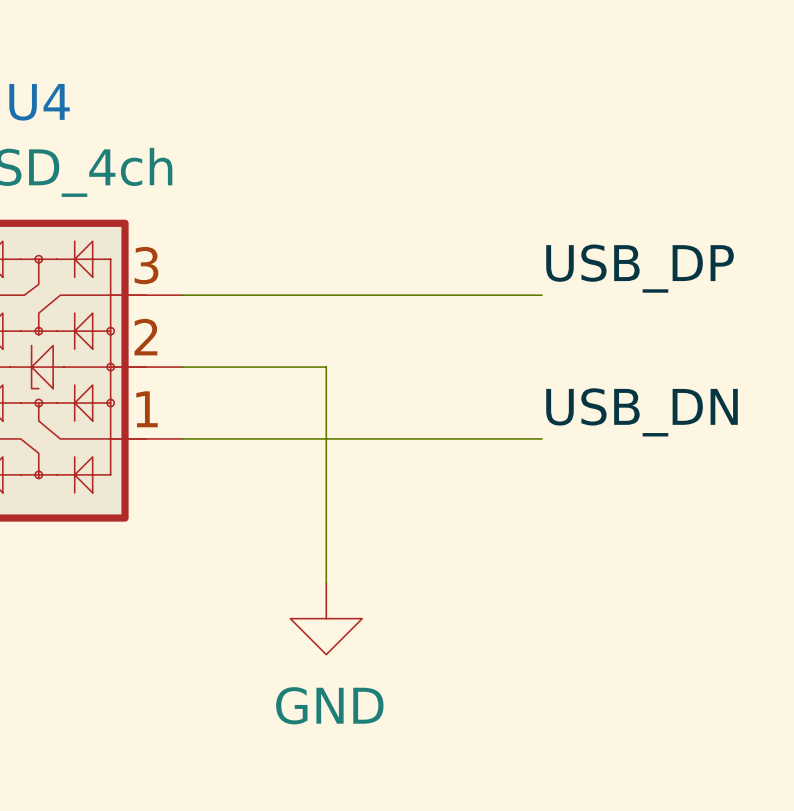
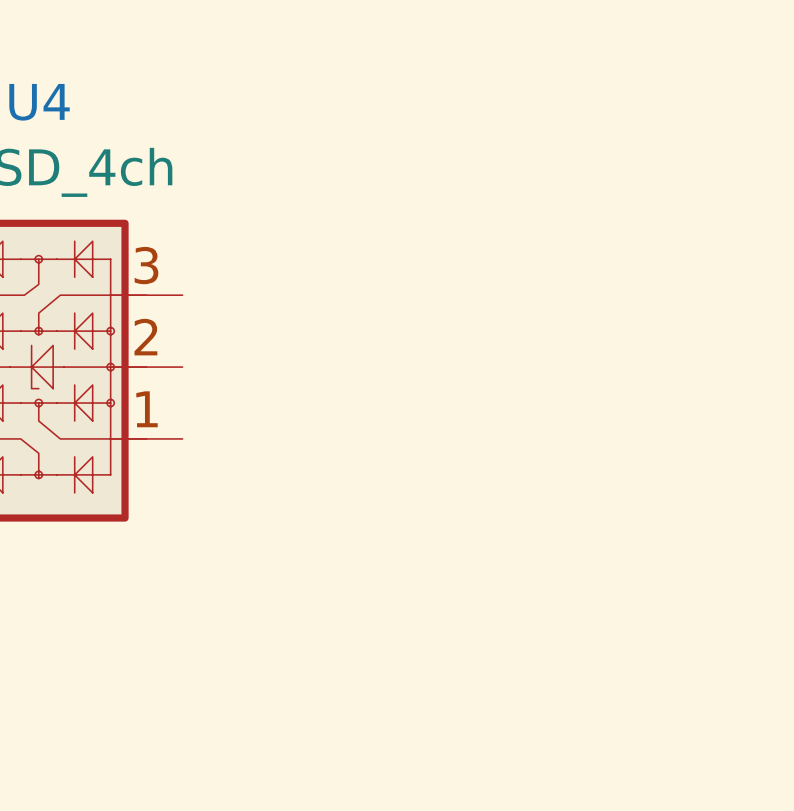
label: USB_DP (640, 268) -> none
wire: (182, 295) (541, 295) -> none
wire: (182, 367) (326, 367) (326, 582) -> none
label: USB_DN (642, 412) -> none
wire: (182, 438) (541, 438) -> none
power symbol: GND (326, 618) -> none

